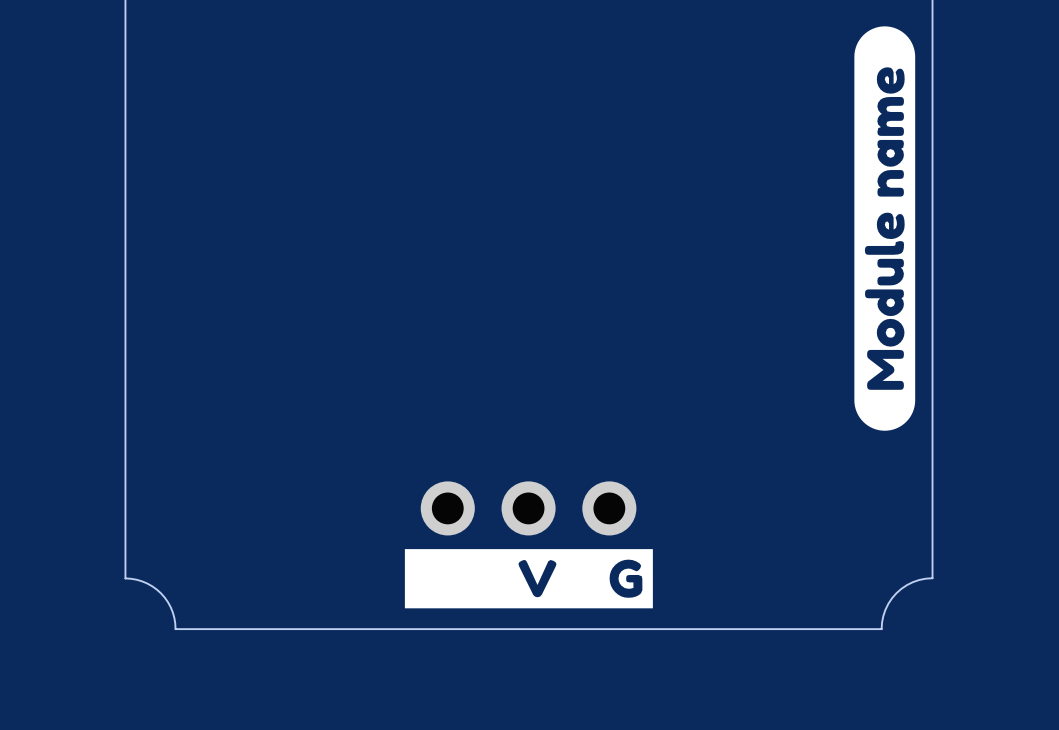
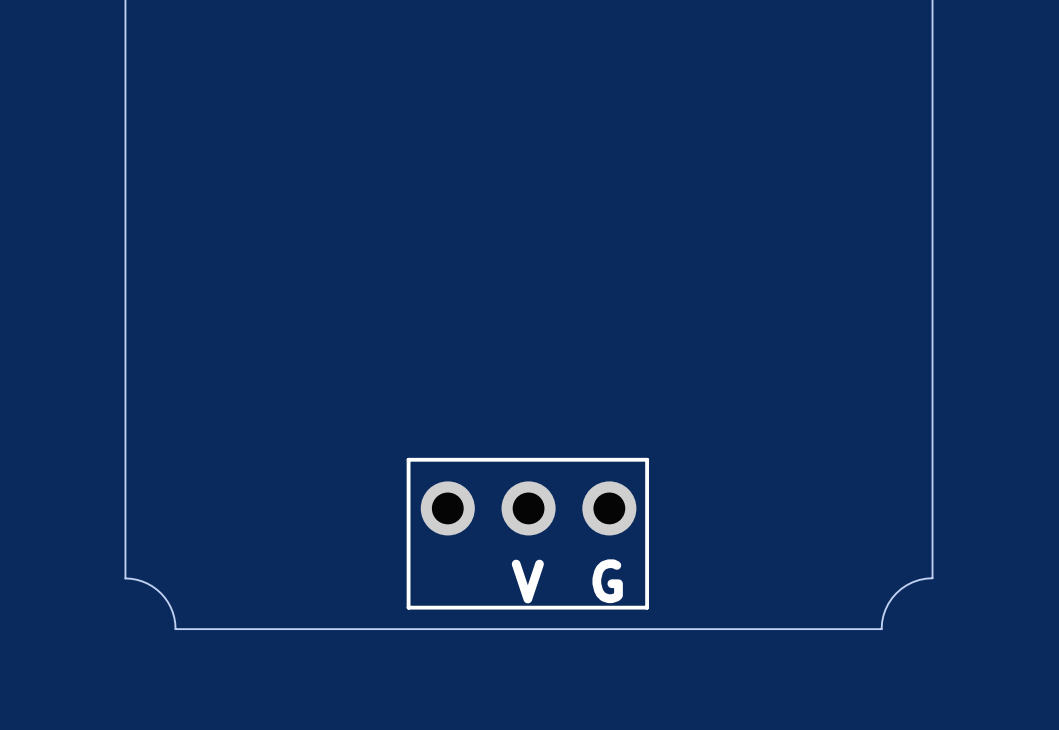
drawing: [854, 26, 916, 431] -> none
line: none -> (408, 459) (408, 607) (647, 607) (647, 459) (408, 459)
drawing: [404, 549, 653, 609] -> none
text: none -> V (527, 581)
text: none -> G (607, 581)

